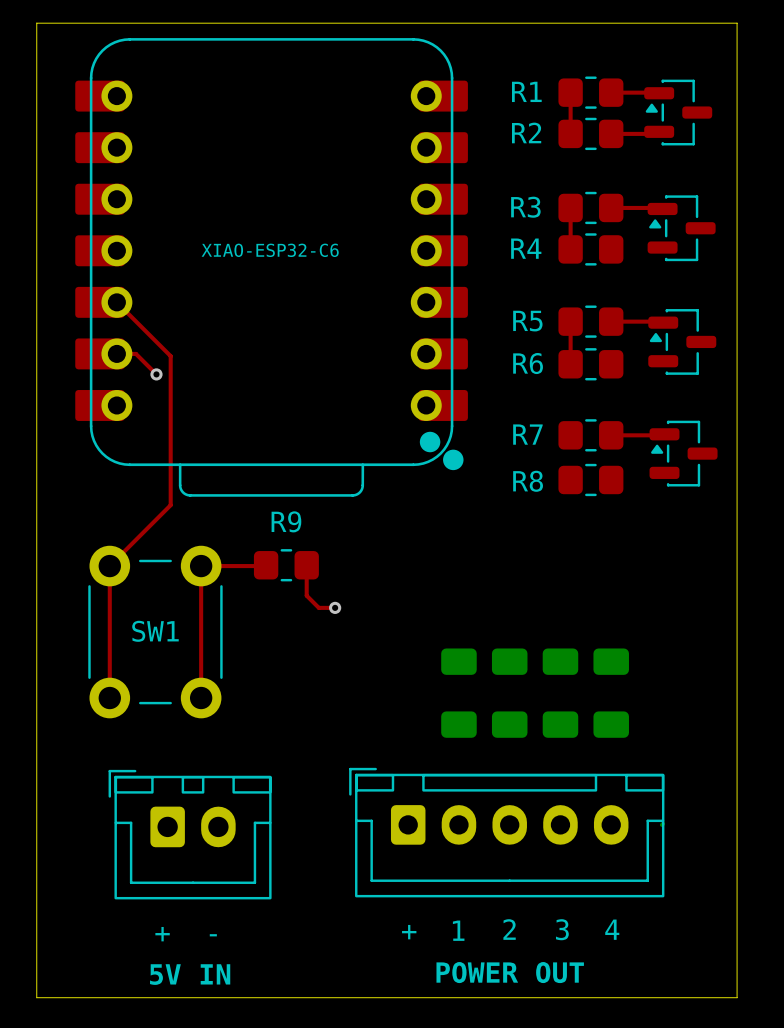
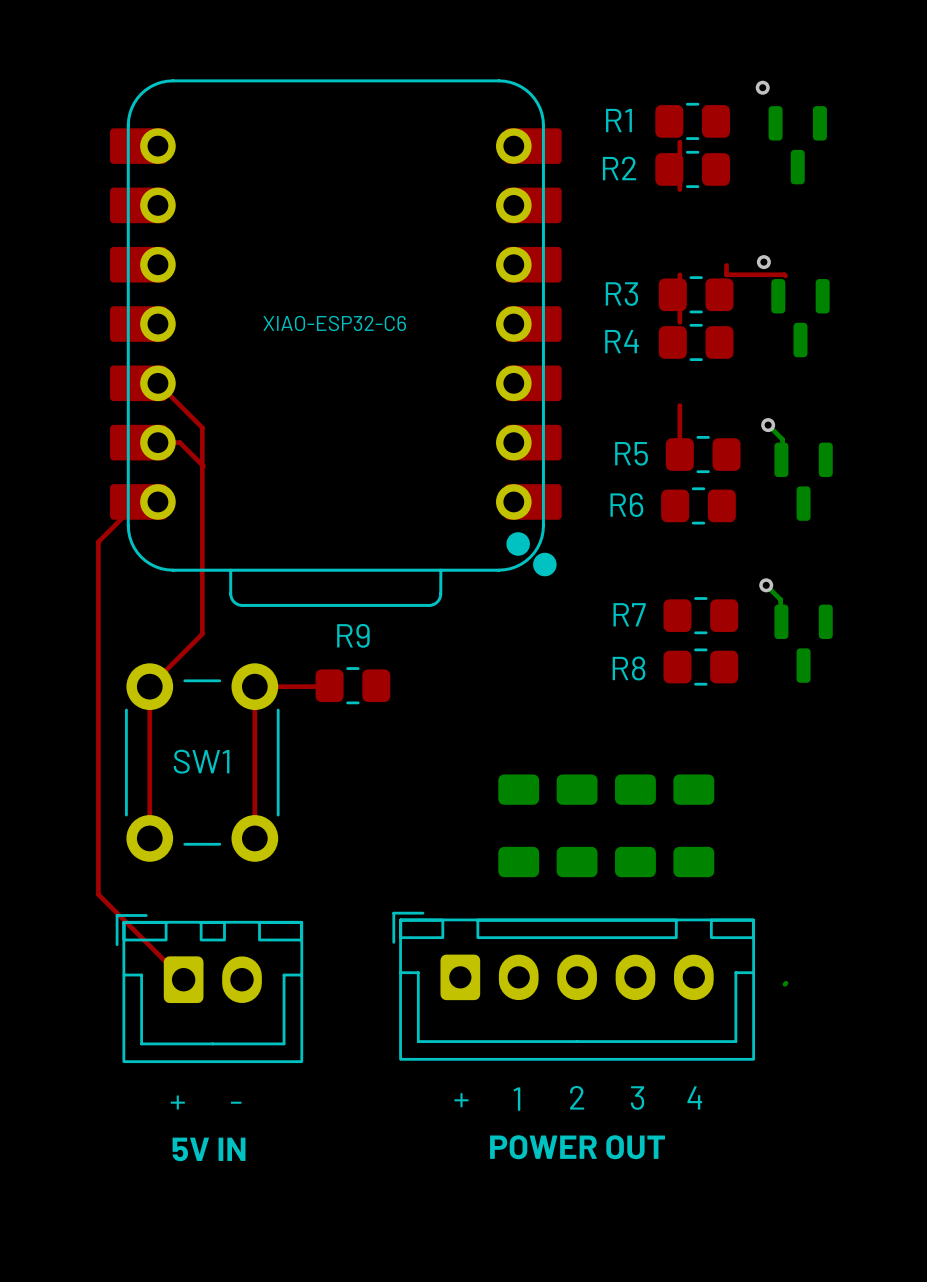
board edge: (36, 23) (737, 23) (737, 997) (36, 997) (36, 23) -> none
via: none -> (762, 87)
R1 position: (590, 92) -> (692, 121)
top track: (611, 92) (659, 93) -> none
part side: top (678, 112) -> bottom (797, 145)
top track: (659, 131) (657, 133) (611, 133) -> none
R2 position: (590, 133) -> (692, 169)
via: none -> (763, 262)
R3 position: (590, 207) -> (696, 294)
part side: top (681, 228) -> bottom (800, 318)
R4 position: (590, 249) -> (696, 342)
R5: (590, 321) -> none
top track: (611, 321) (660, 321) (663, 323) -> none
bottom track: none -> (768, 425) (782, 439) (782, 459)
via: none -> (768, 425)
top track: (155, 340) (170, 356) (170, 505) (155, 520) -> (202, 427) (202, 634)
part side: top (682, 341) -> bottom (803, 481)
R6 name: R6 (528, 363) -> R5 (631, 453)
via: (156, 374) -> none
top track: none -> (138, 501) (98, 542) (98, 894) (183, 979)
R6: none -> (698, 505)
R7 position: (590, 435) -> (700, 615)
top track: (611, 435) (664, 436) -> none
part side: top (683, 453) -> bottom (803, 643)
bottom track: none -> (766, 585) (780, 599) (780, 619)
via: none -> (766, 585)
R8 position: (590, 479) -> (700, 667)
top track: (306, 563) (306, 595) (318, 607) (335, 607) -> none
via: (335, 607) -> none
part: none -> (518, 825)
part: none -> (577, 825)
part: none -> (635, 825)
part: none -> (693, 825)
part: (458, 693) -> none
part: (509, 693) -> none
part: (560, 693) -> none
part: (611, 693) -> none
part position: (506, 832) -> (573, 986)
part position: (190, 834) -> (209, 988)
text position: 2 (509, 929) -> 2 (577, 1097)
text position: 3 (562, 929) -> 3 (637, 1098)
text position: 4 (612, 929) -> 4 (694, 1097)
text position: 1 (458, 930) -> 1 (516, 1099)
text position: + (409, 932) -> + (461, 1100)
text position: + (162, 934) -> + (177, 1102)
text position: - (213, 935) -> - (236, 1102)

